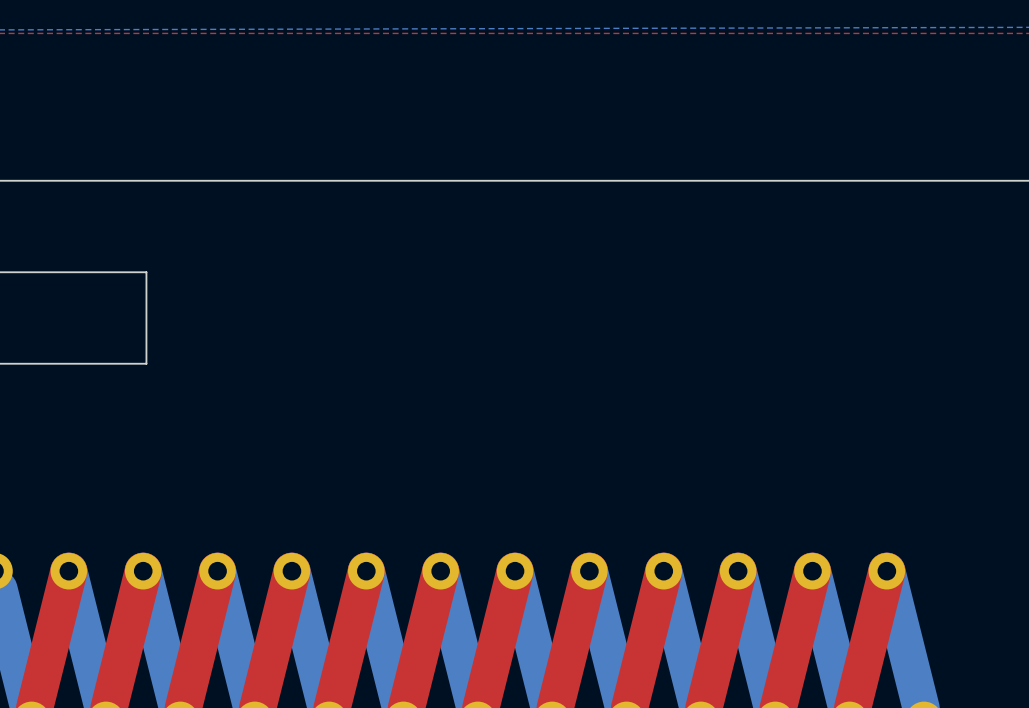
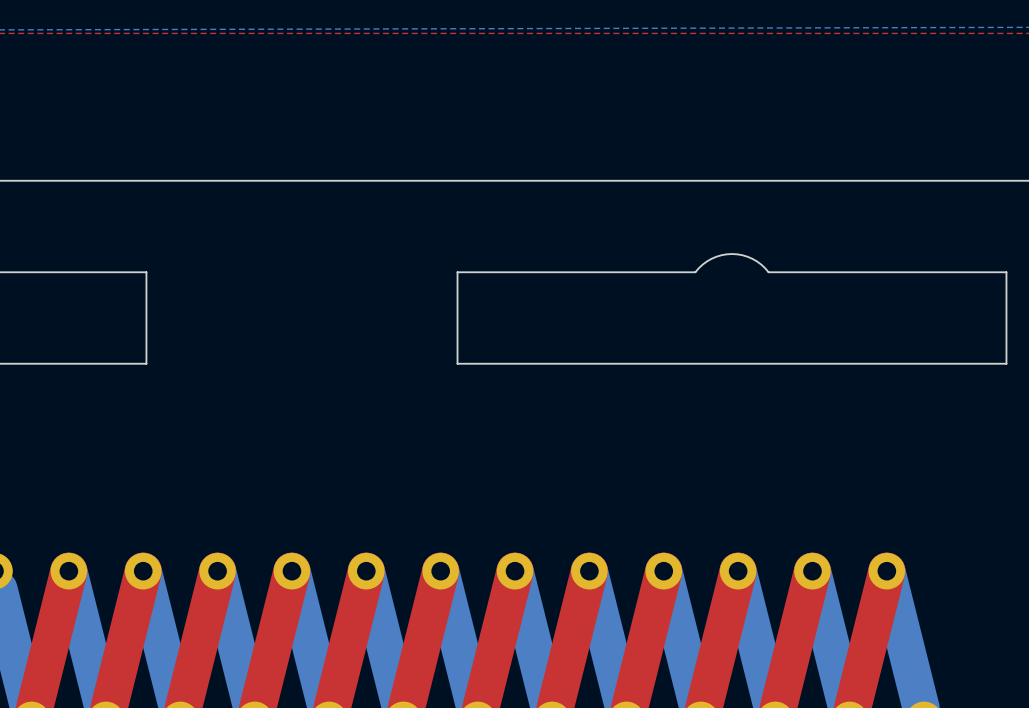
board edge: none -> (457, 272) (695, 272) (711, 258) (731, 254) (752, 258) (768, 272) (1006, 272) (1006, 363) (457, 363) (457, 272)

